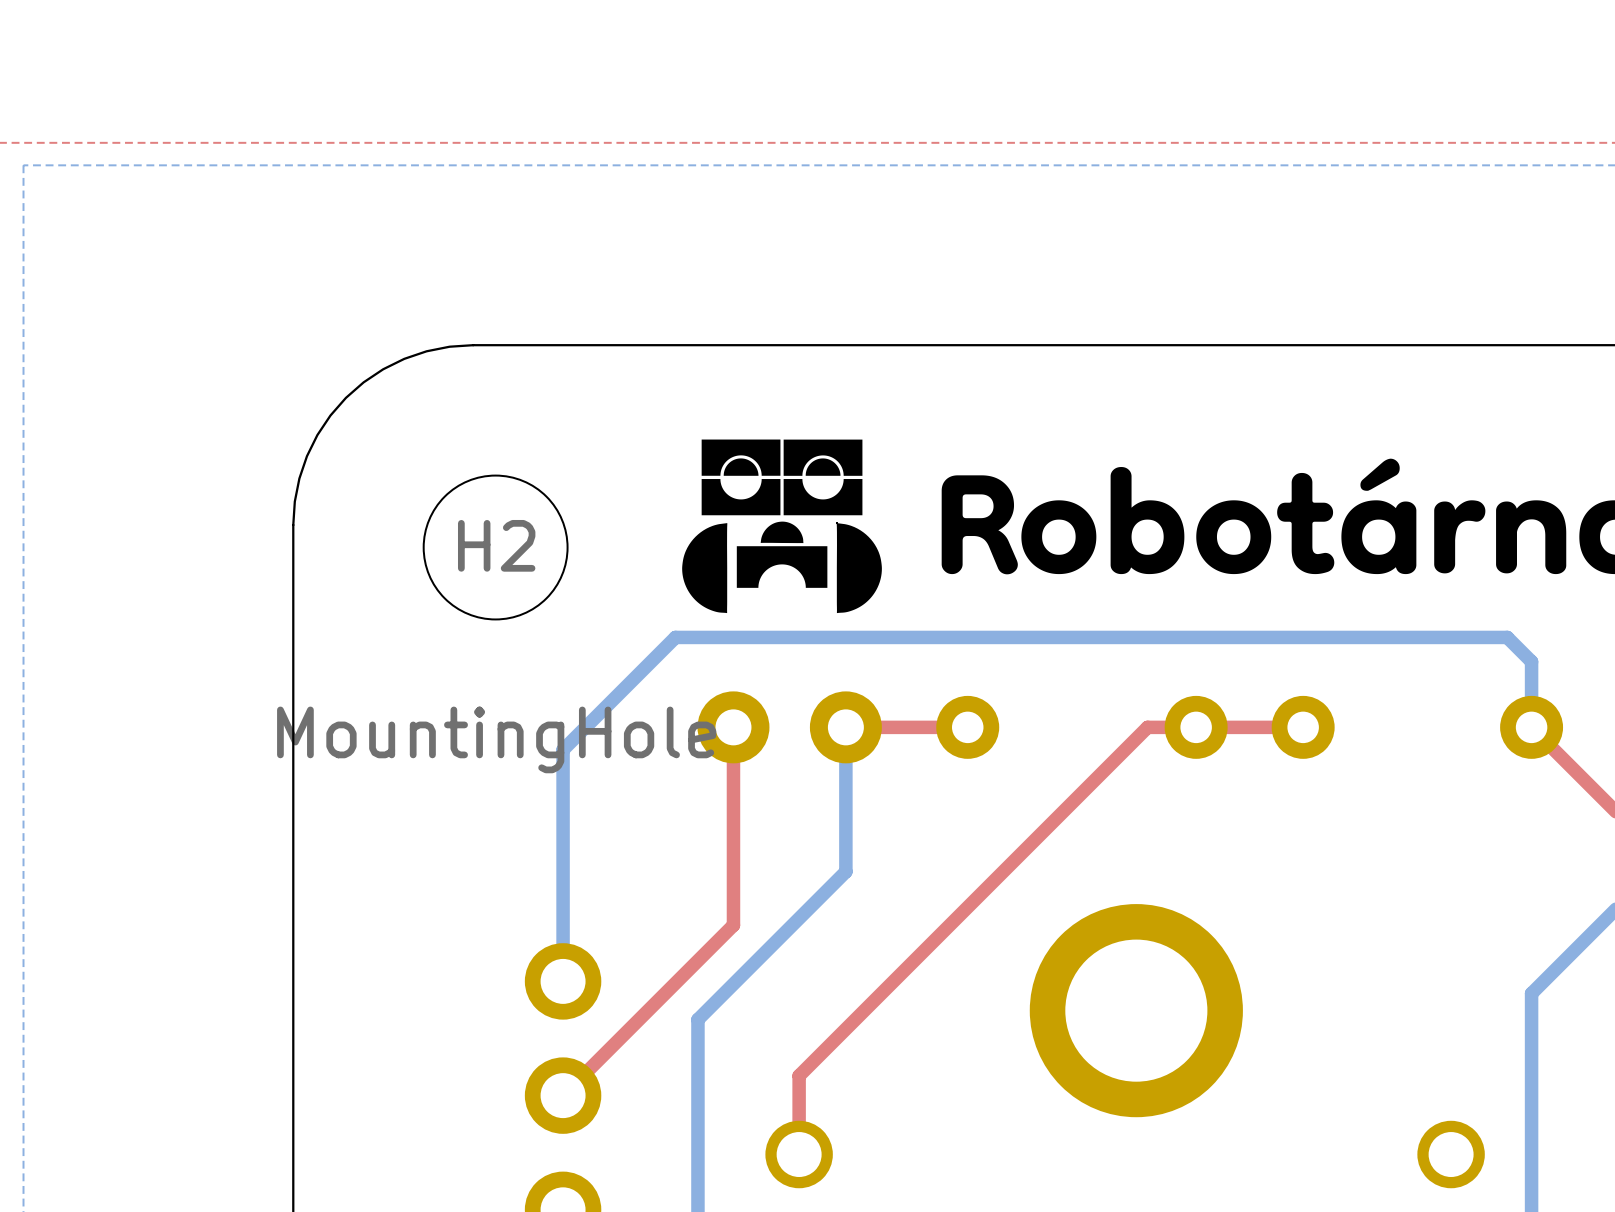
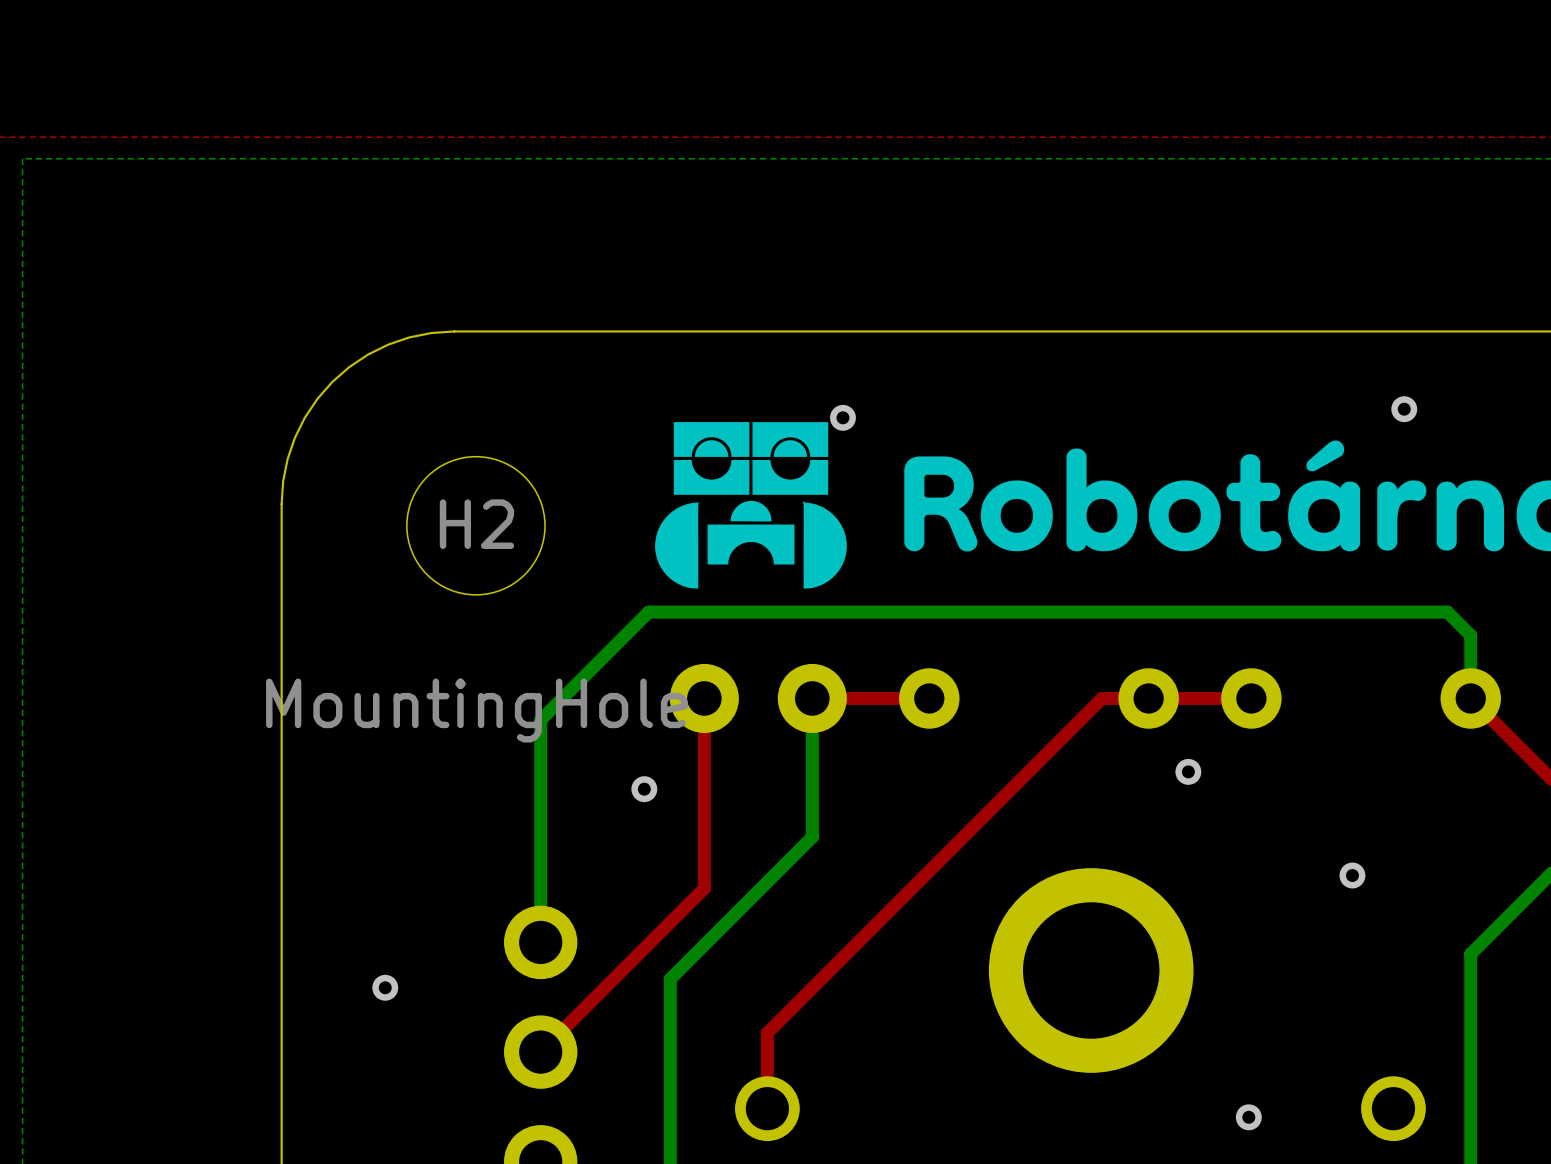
via: none -> (1404, 409)
via: none -> (842, 417)
via: none -> (1188, 771)
via: none -> (644, 789)
via: none -> (1352, 875)
via: none -> (385, 987)
via: none -> (1248, 1117)

